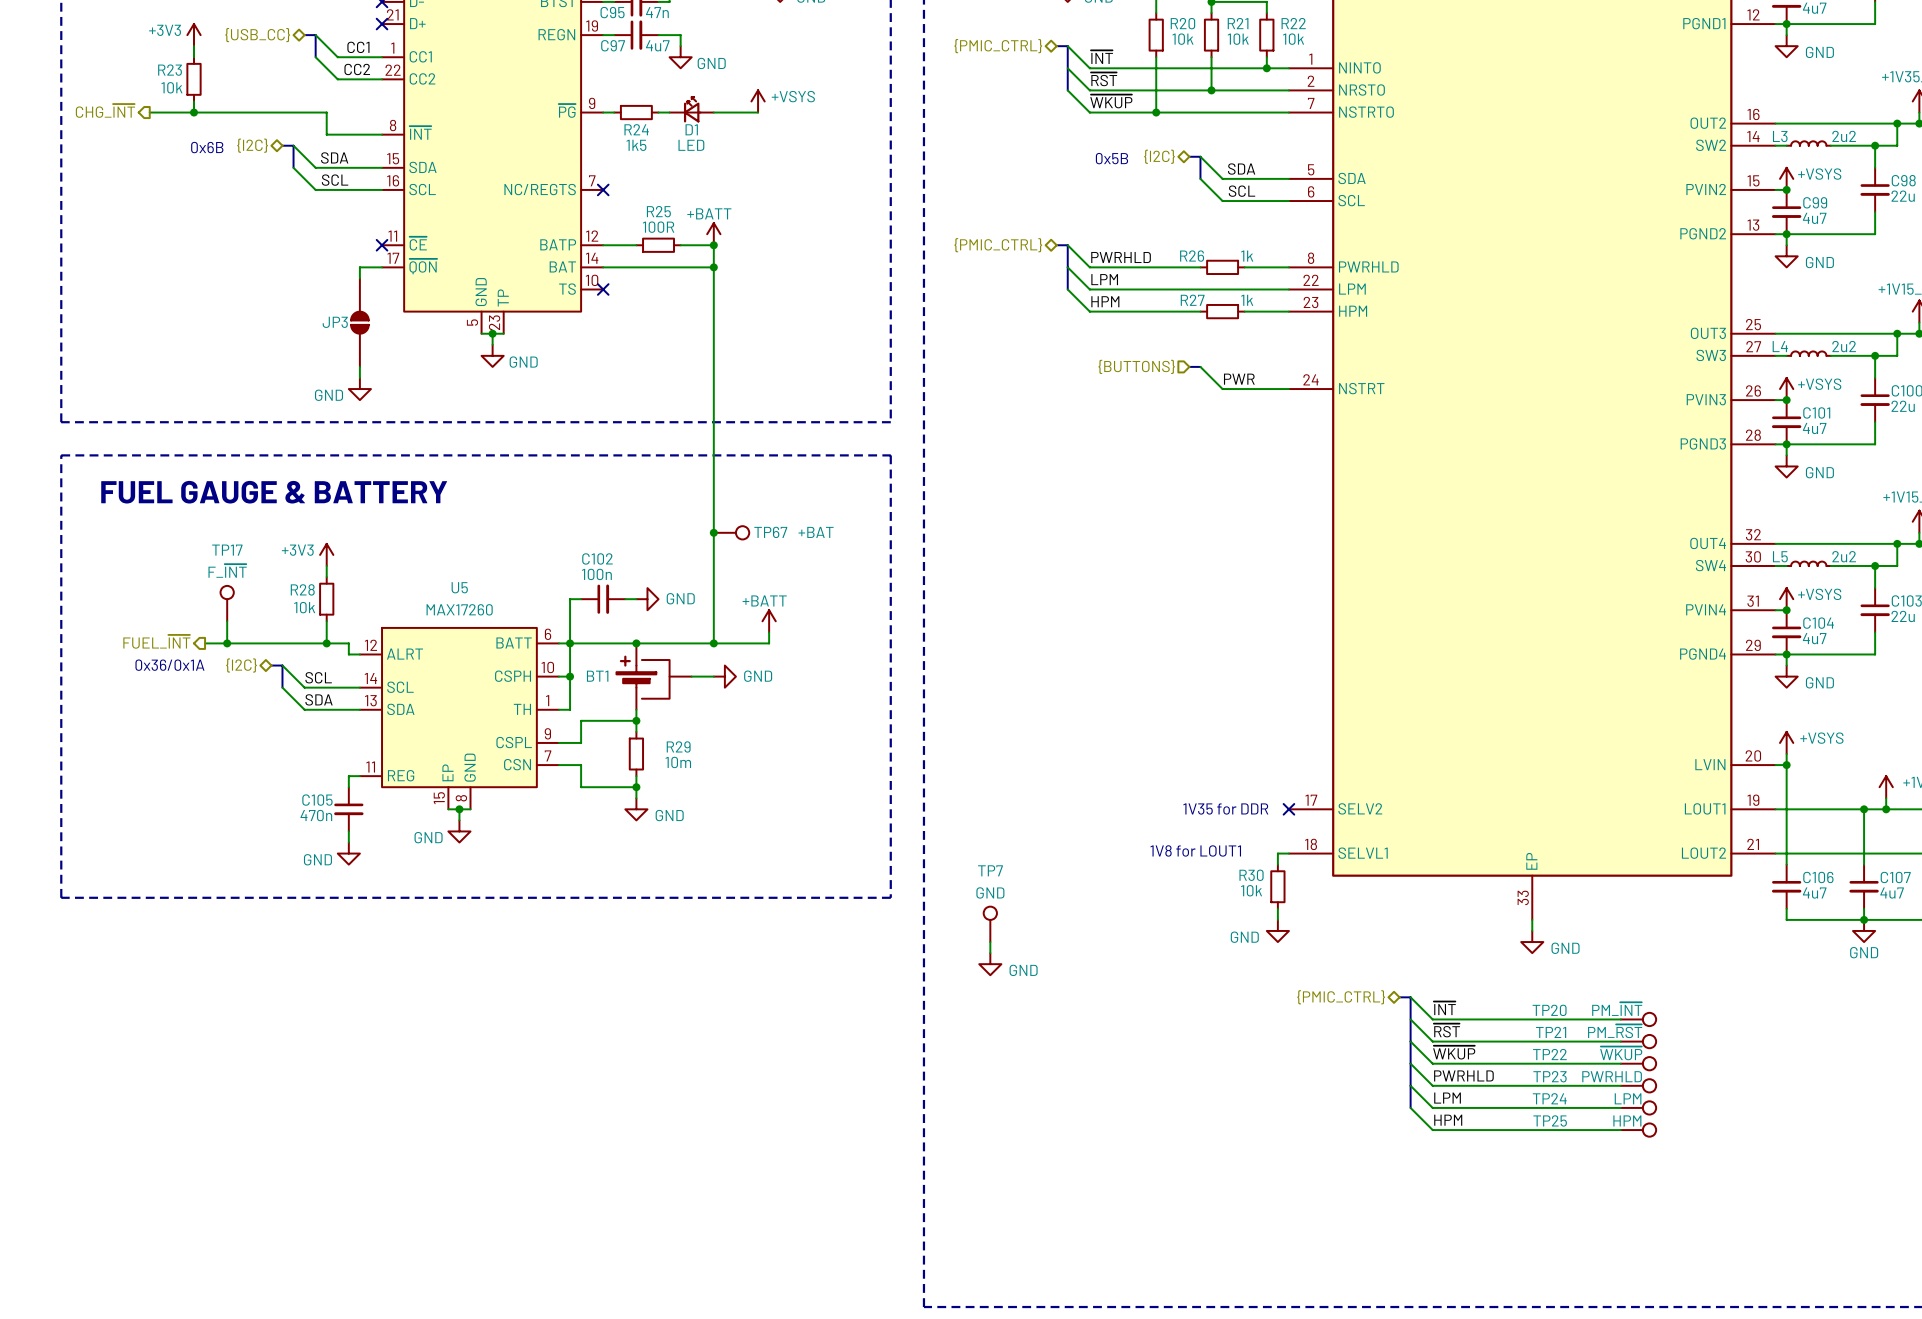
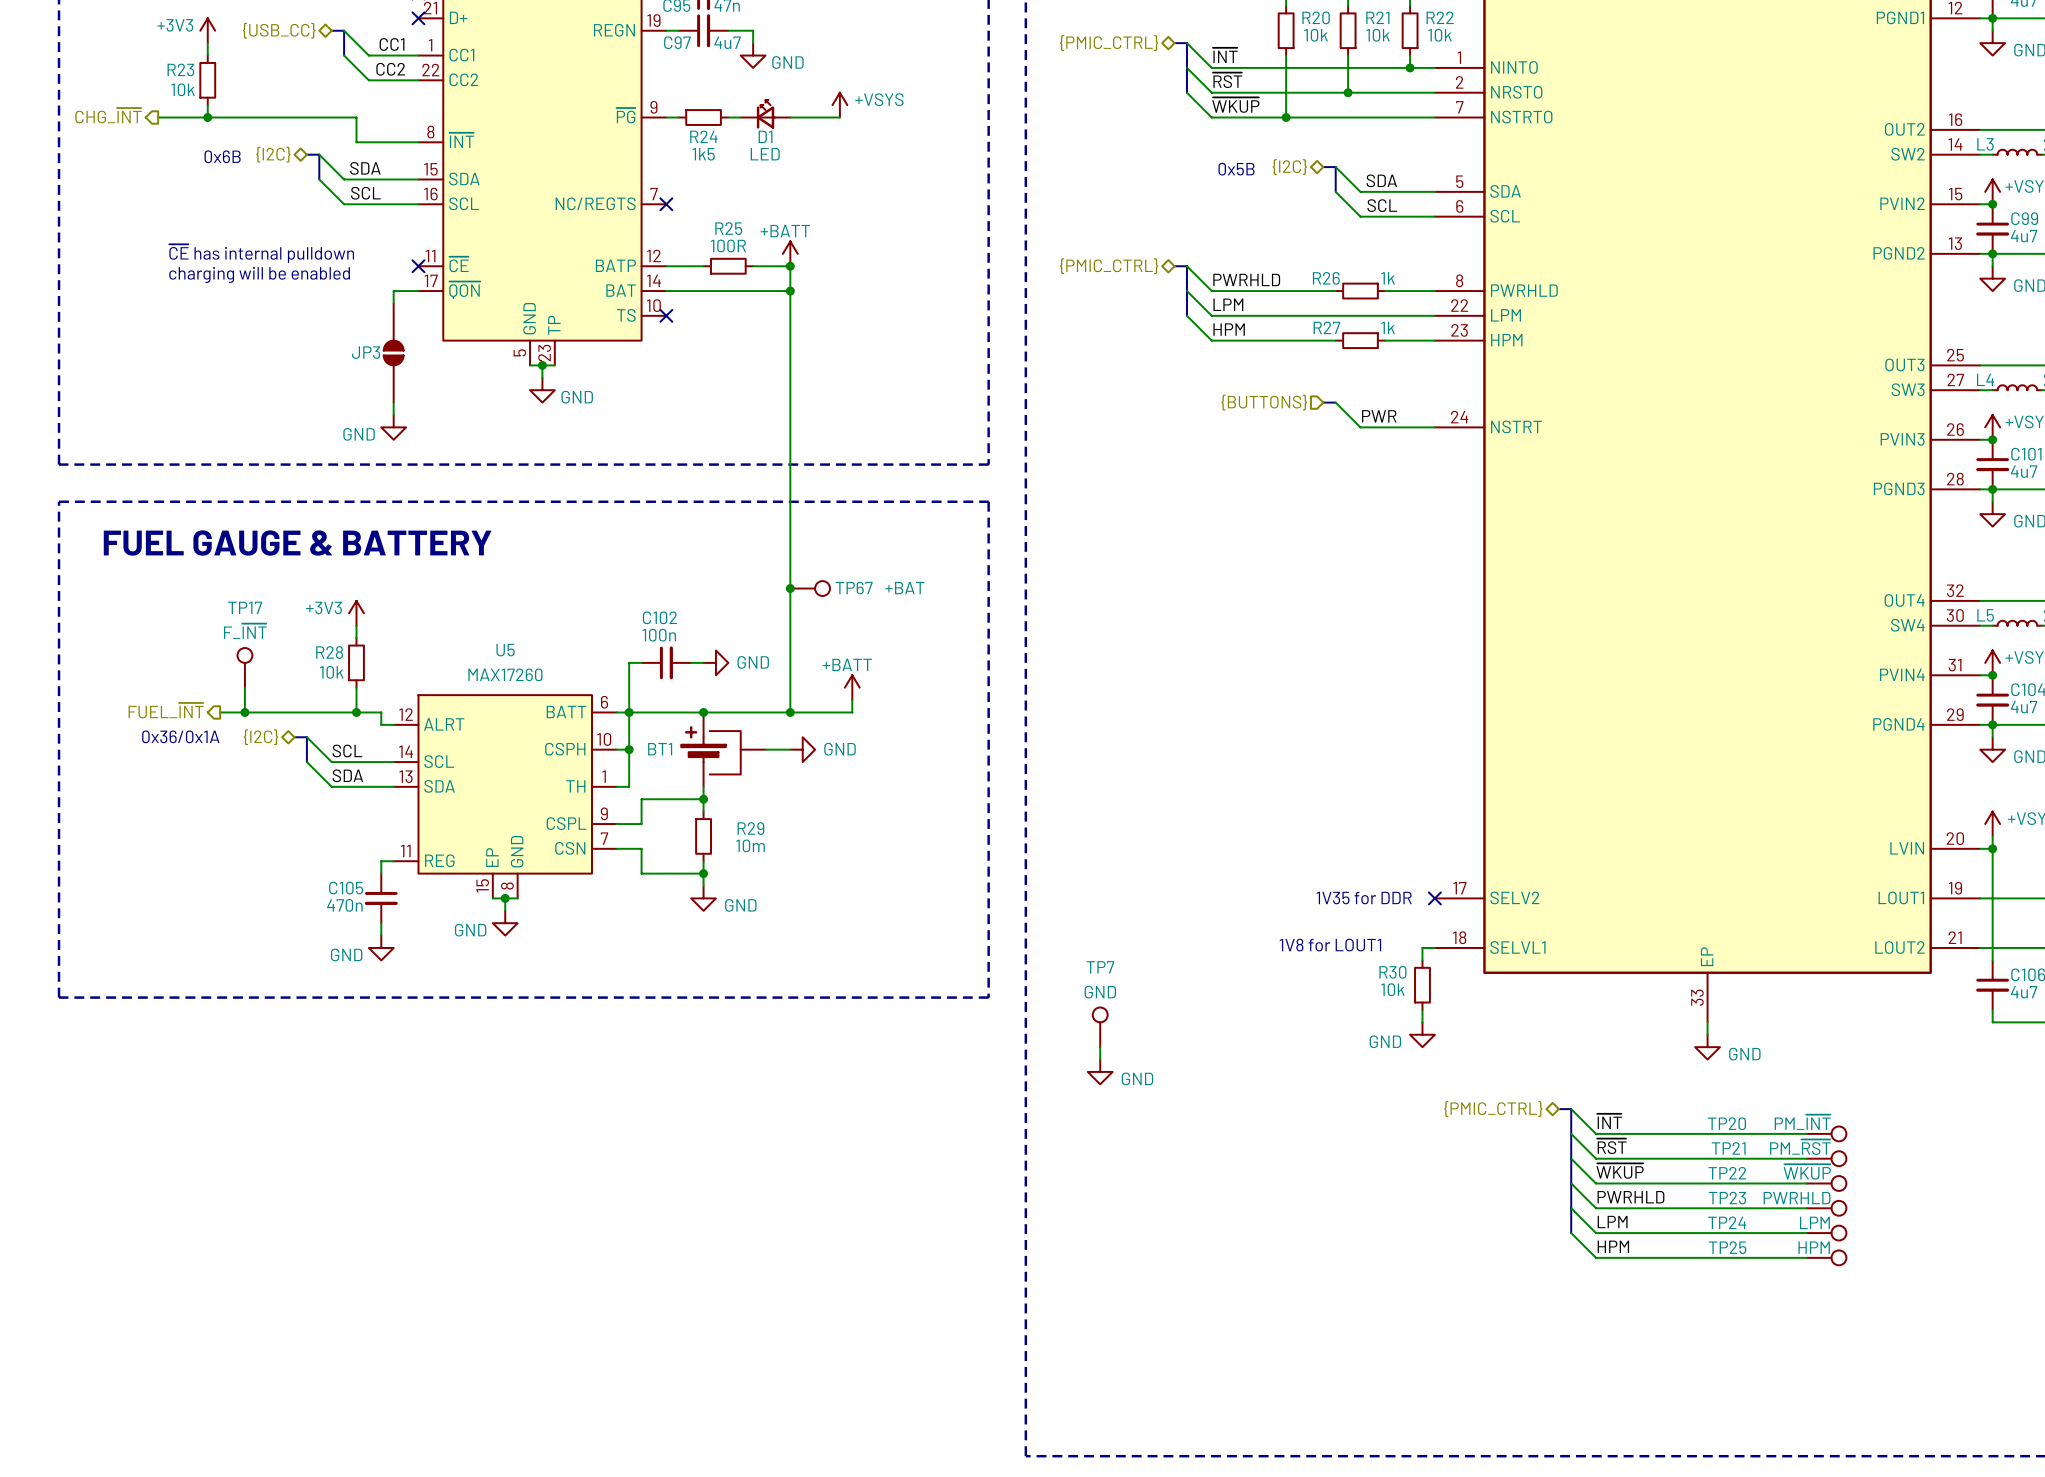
text: none -> ~{CE} has internal pulldown (261, 253)
text: none -> charging will be enabled (259, 275)

